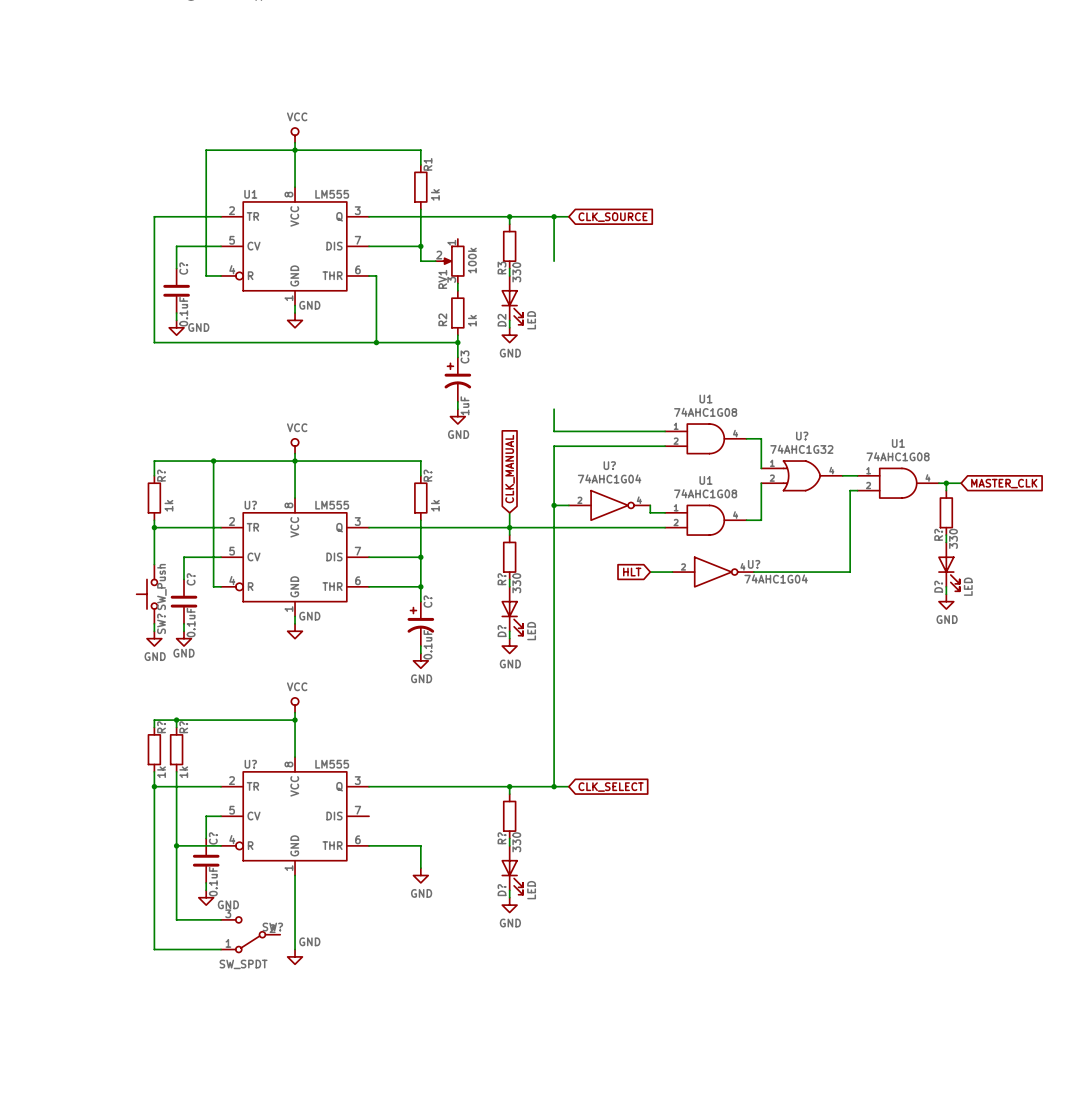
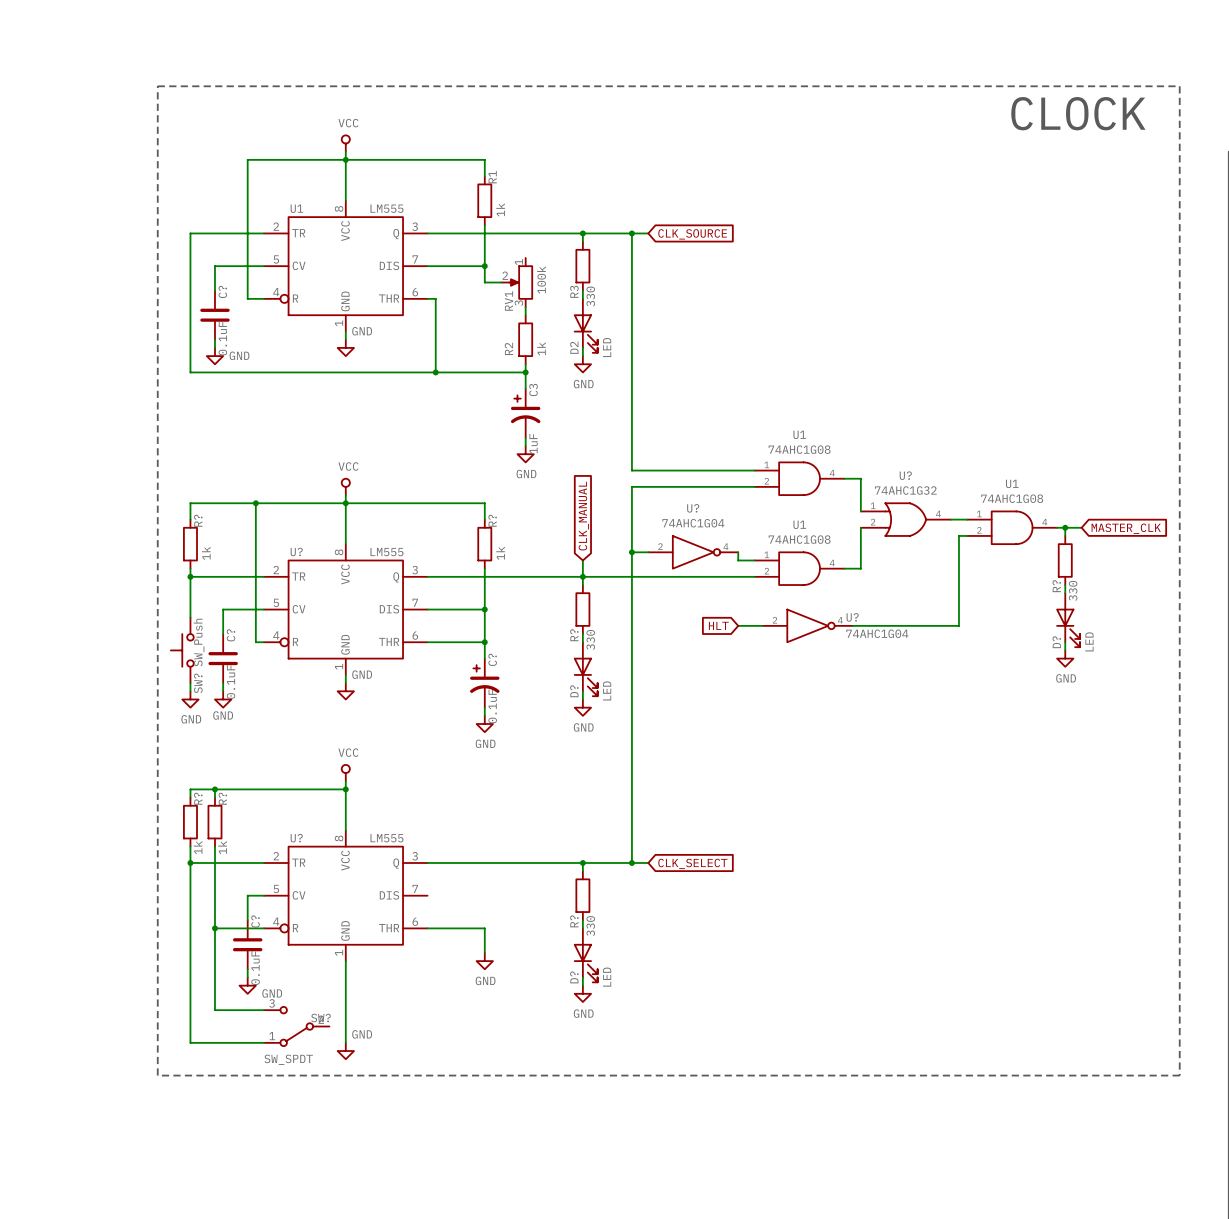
line: none -> (157, 86) (1179, 86) (1179, 1075) (157, 1075) (157, 86)
text: none -> CLOCK (1078, 113)
wire: none -> (631, 282) (631, 446)

